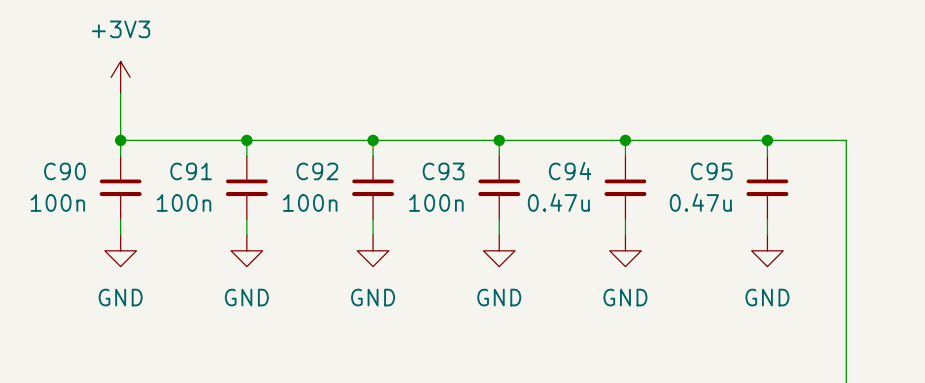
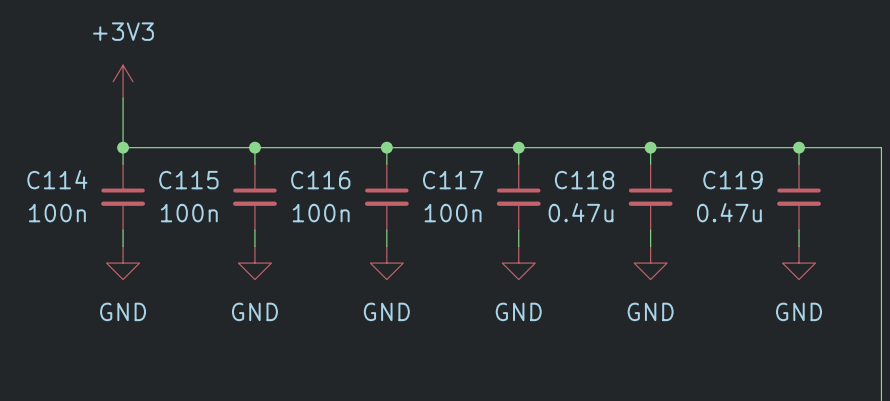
C90 name: C90 (64, 171) -> C114 (57, 179)
C91 name: C91 (191, 171) -> C115 (188, 180)
C92 name: C92 (317, 171) -> C116 (320, 180)
C93 name: C93 (443, 171) -> C117 (453, 180)
C94 name: C94 (570, 171) -> C118 (584, 180)
C95 name: C95 (711, 171) -> C119 (732, 180)

